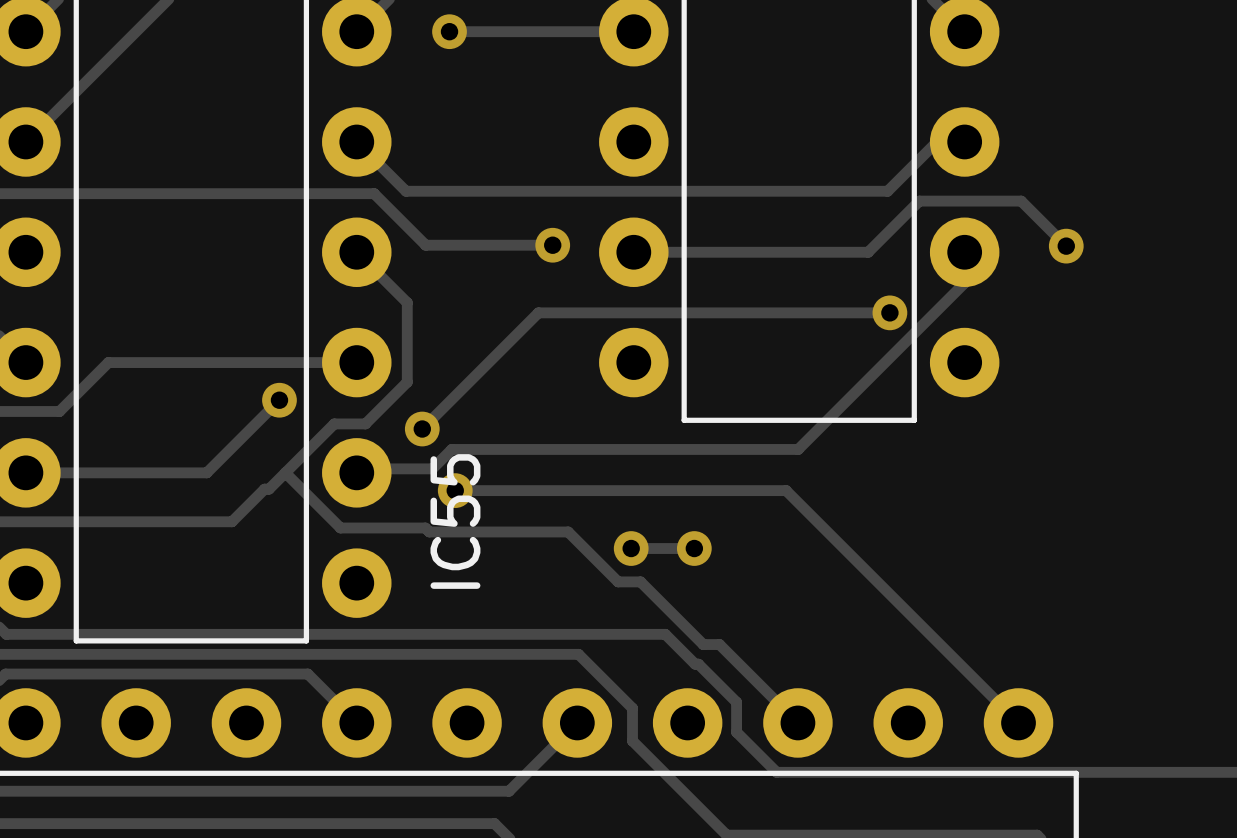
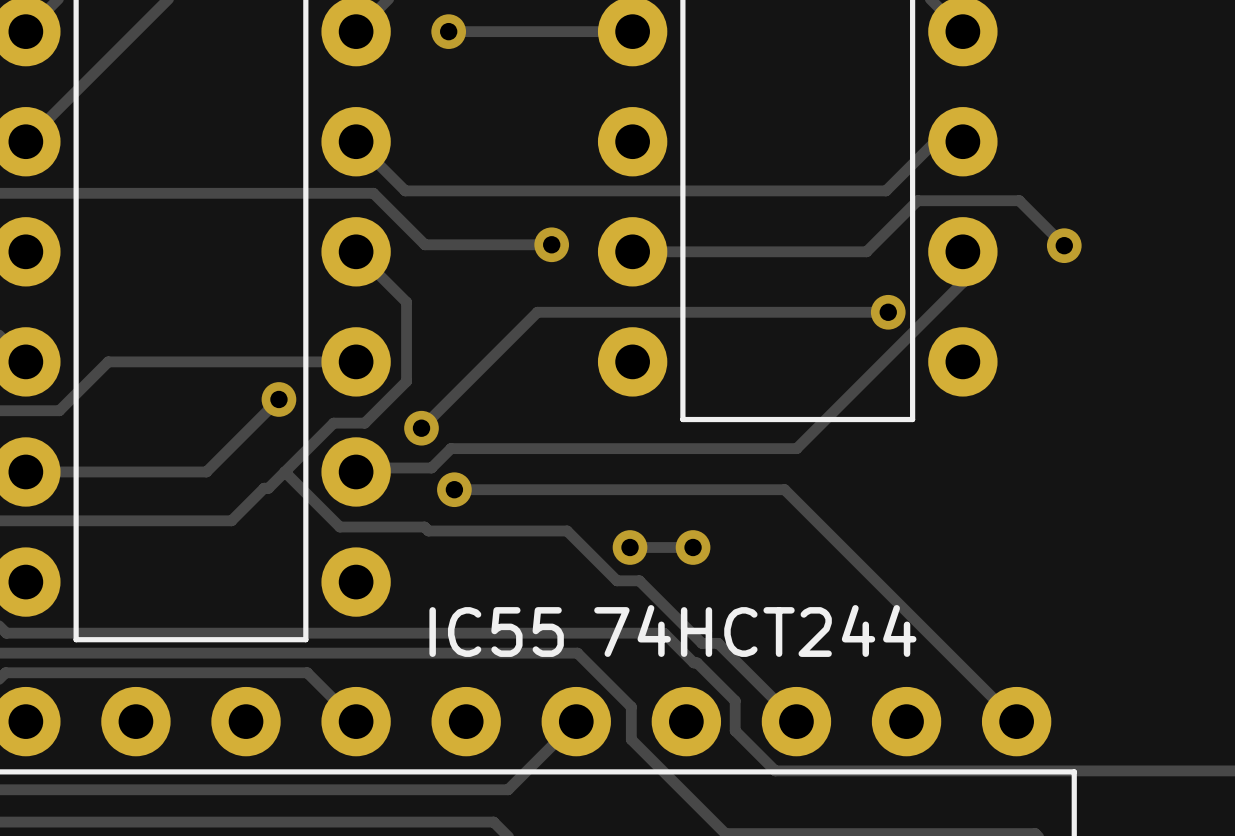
IC55 name rotation: 0° (455, 521) -> 90° clockwise (496, 632)
text: none -> 74HCT244 (755, 630)

